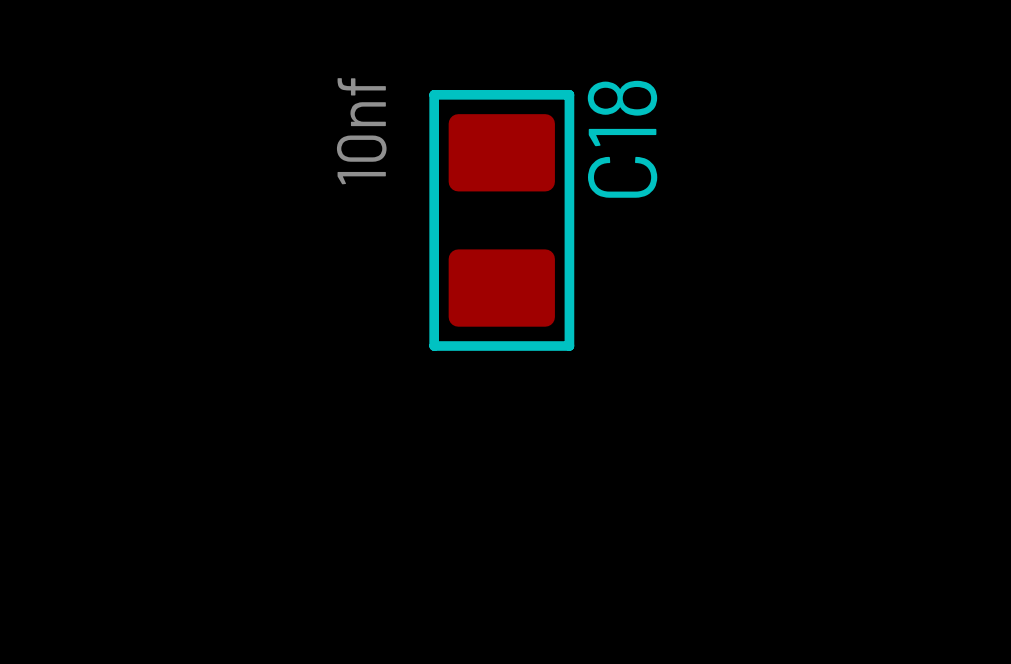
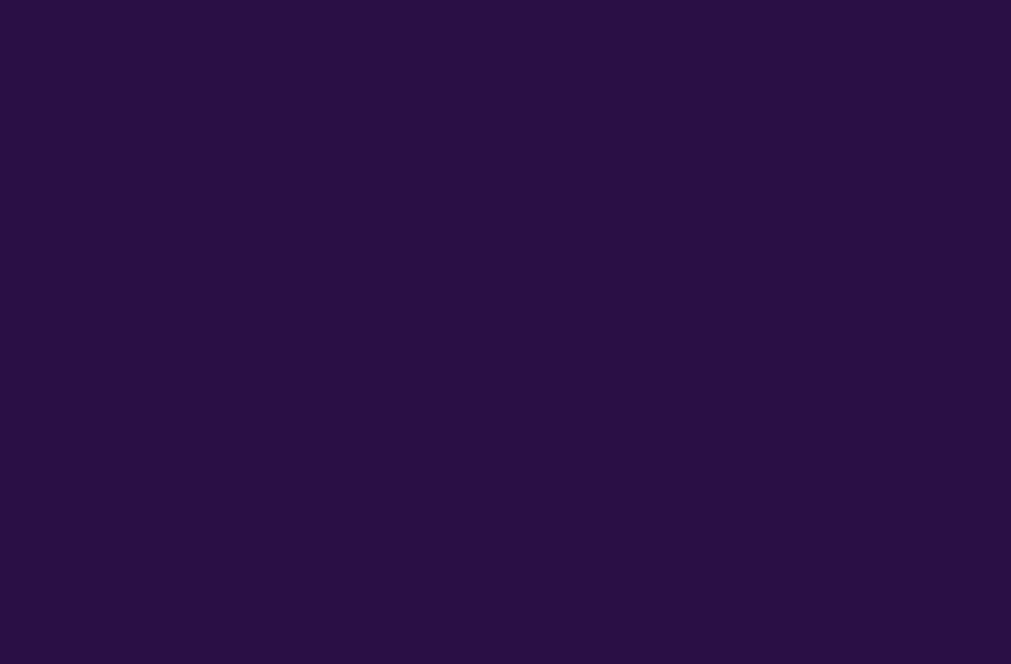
C18: 10nf (501, 220) -> none

